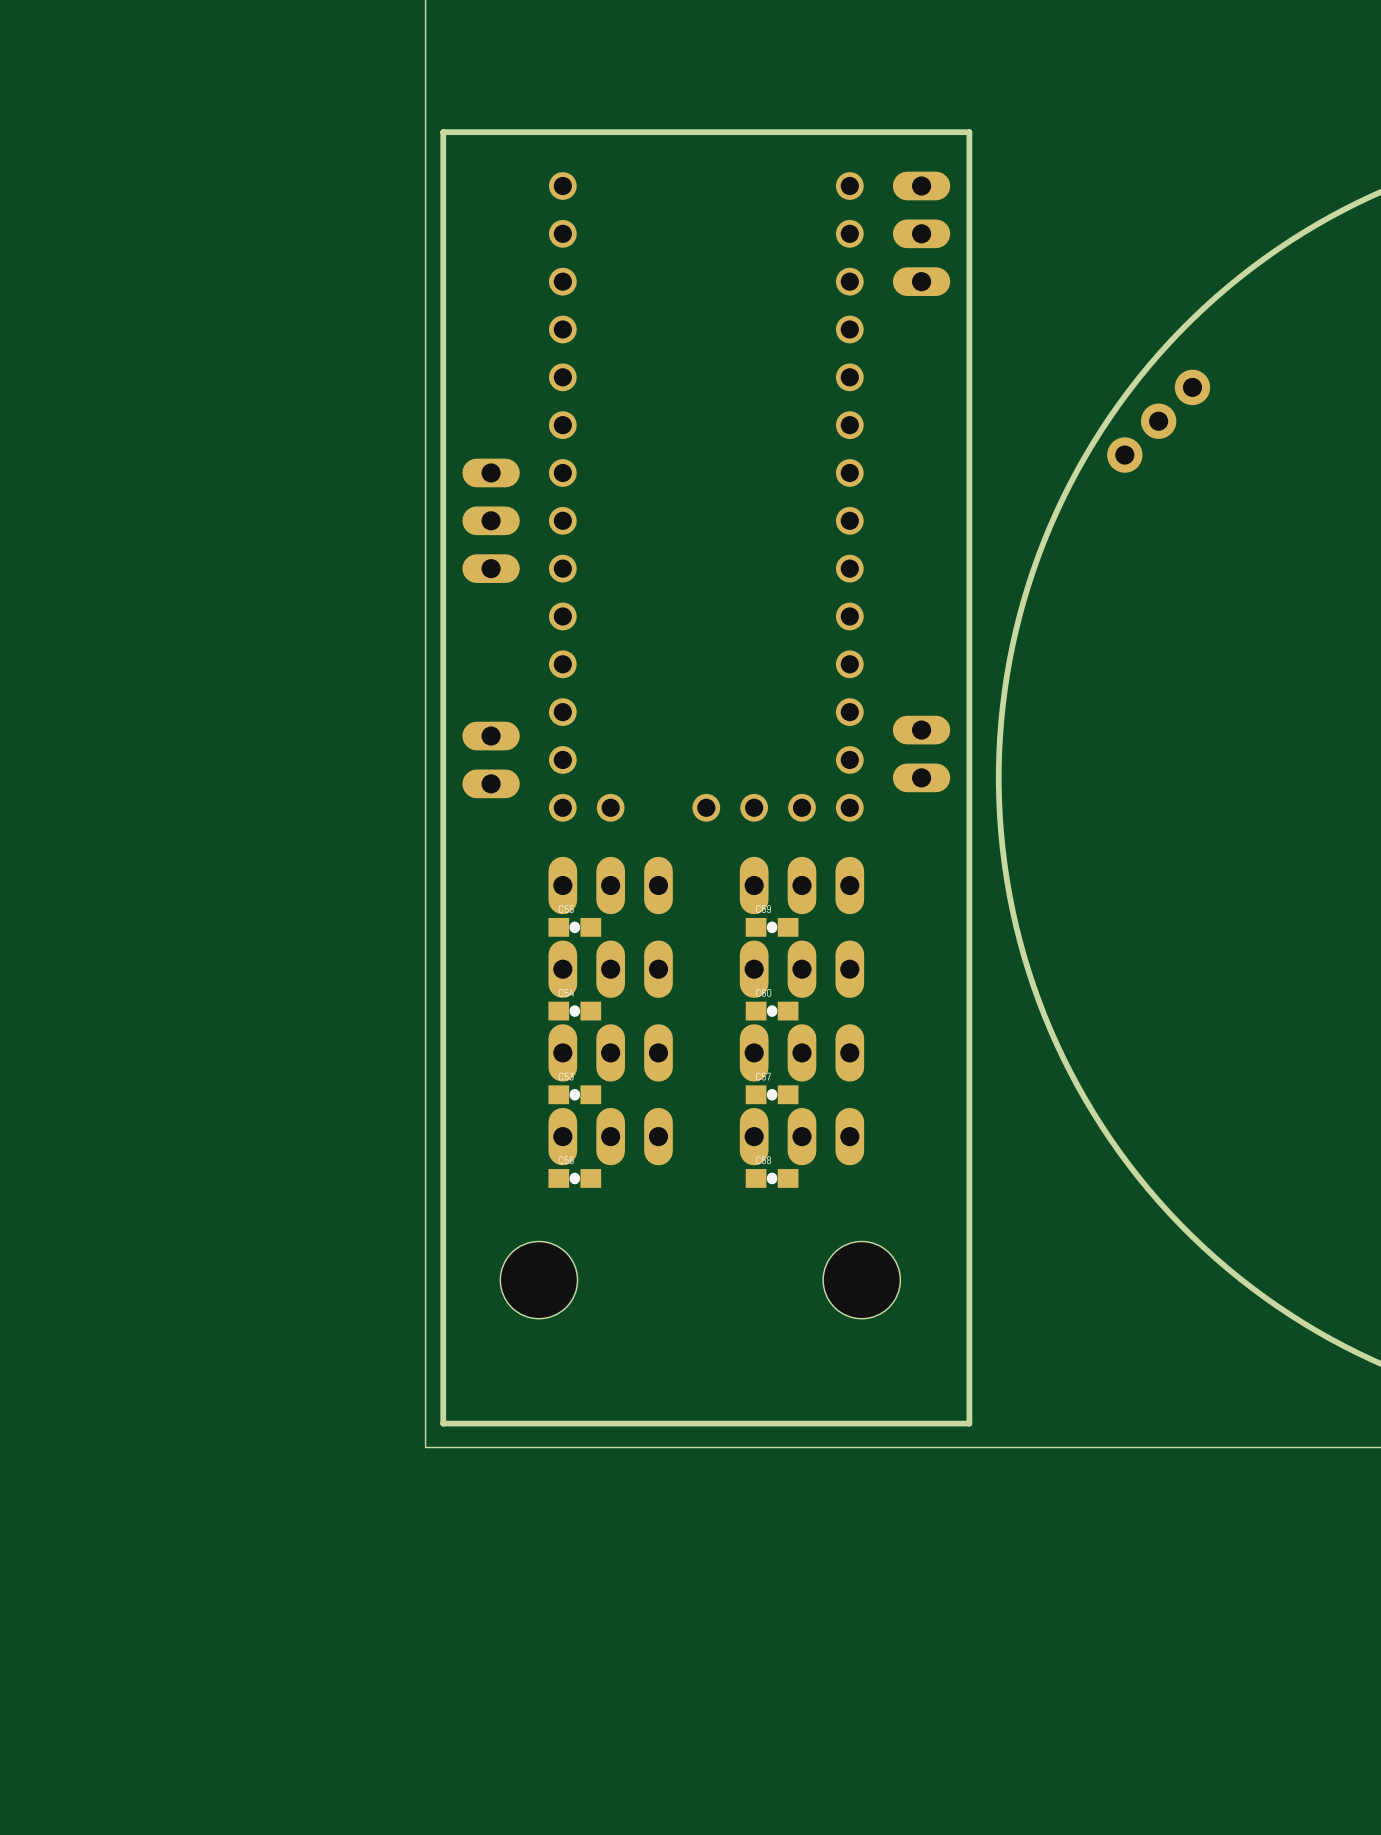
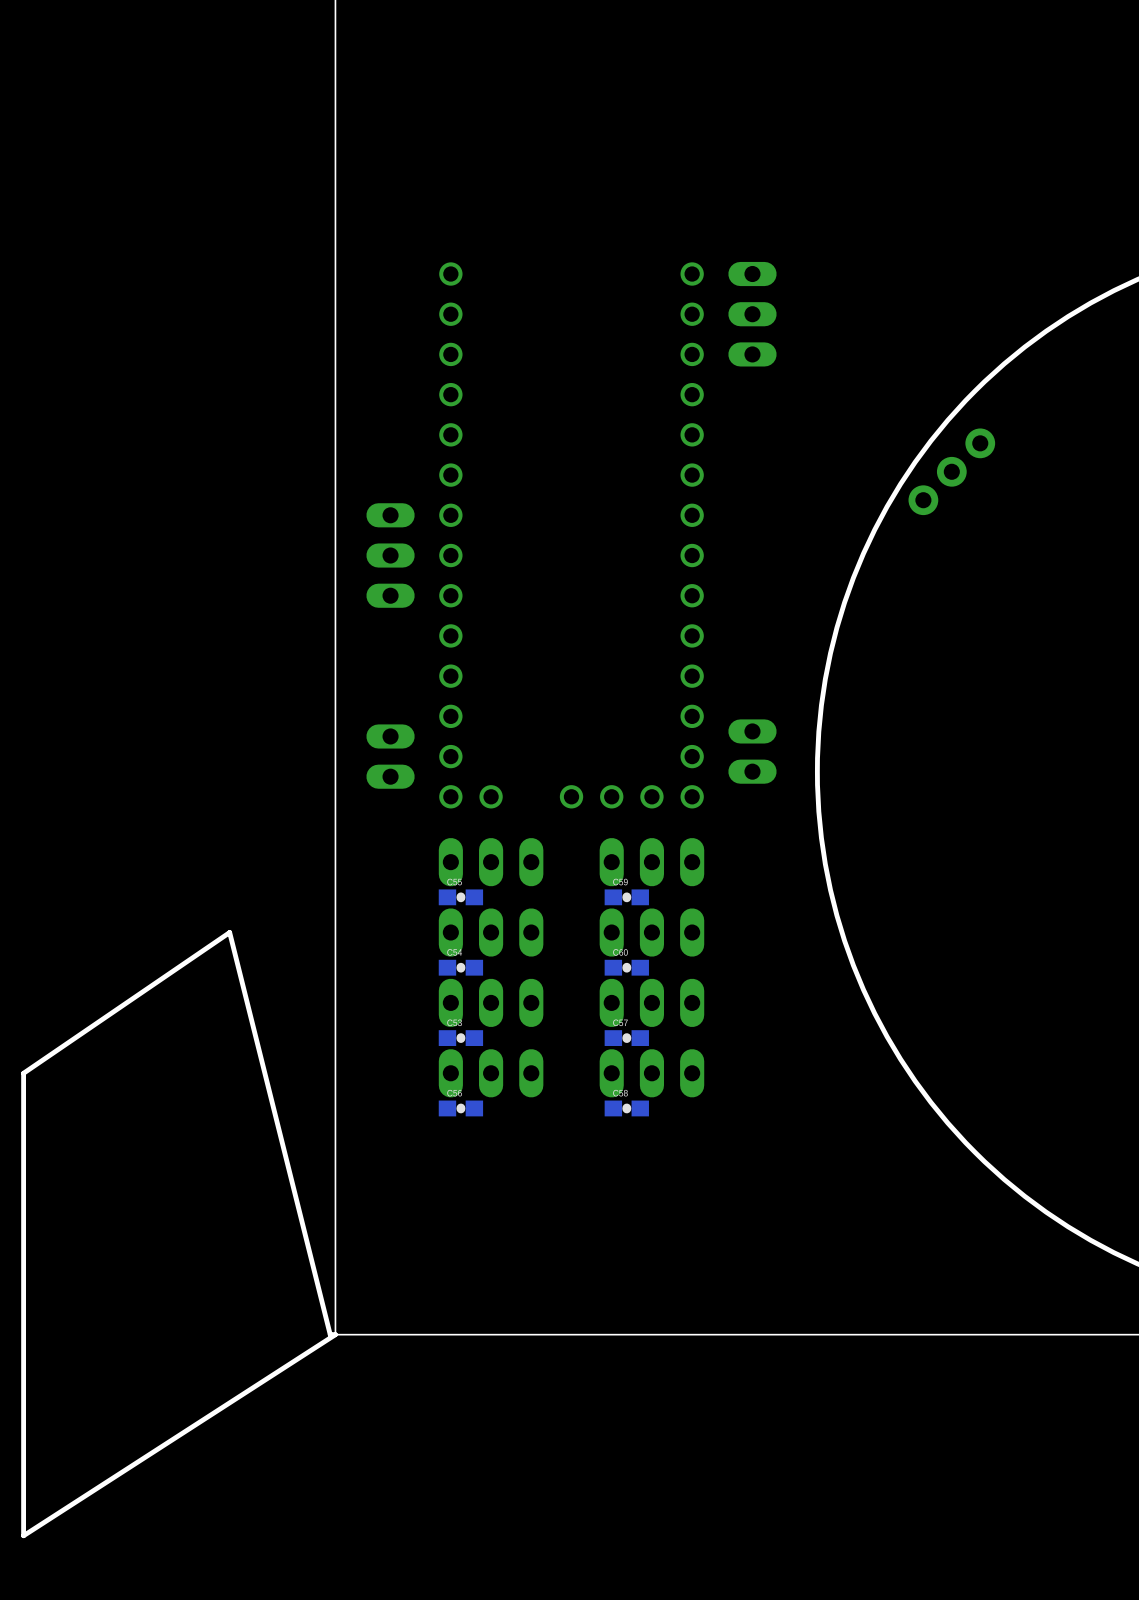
board edge: (969, 132) (443, 132) (443, 1423) (969, 1423) (969, 132) -> none
board edge: none -> (229, 932) (23, 1073) (23, 1535) (335, 1334) (330, 1334) (229, 932)
hole: (538, 1280) -> none
hole: (861, 1280) -> none

